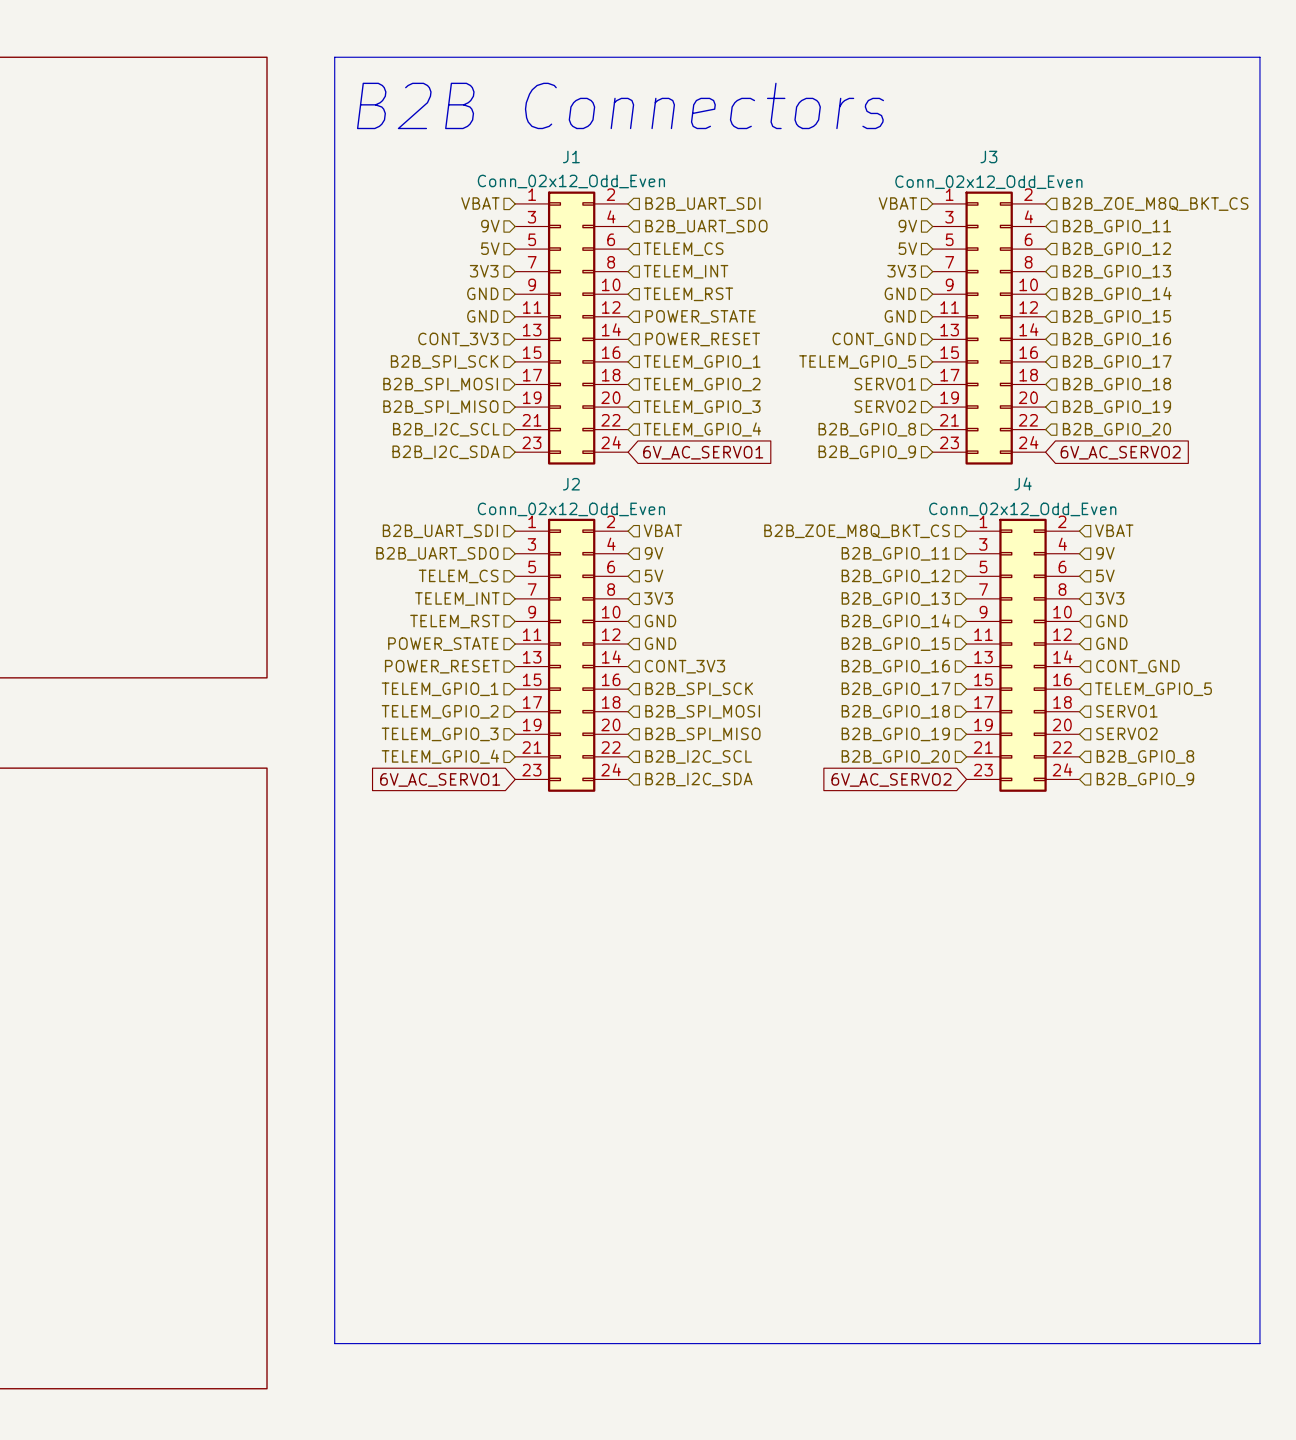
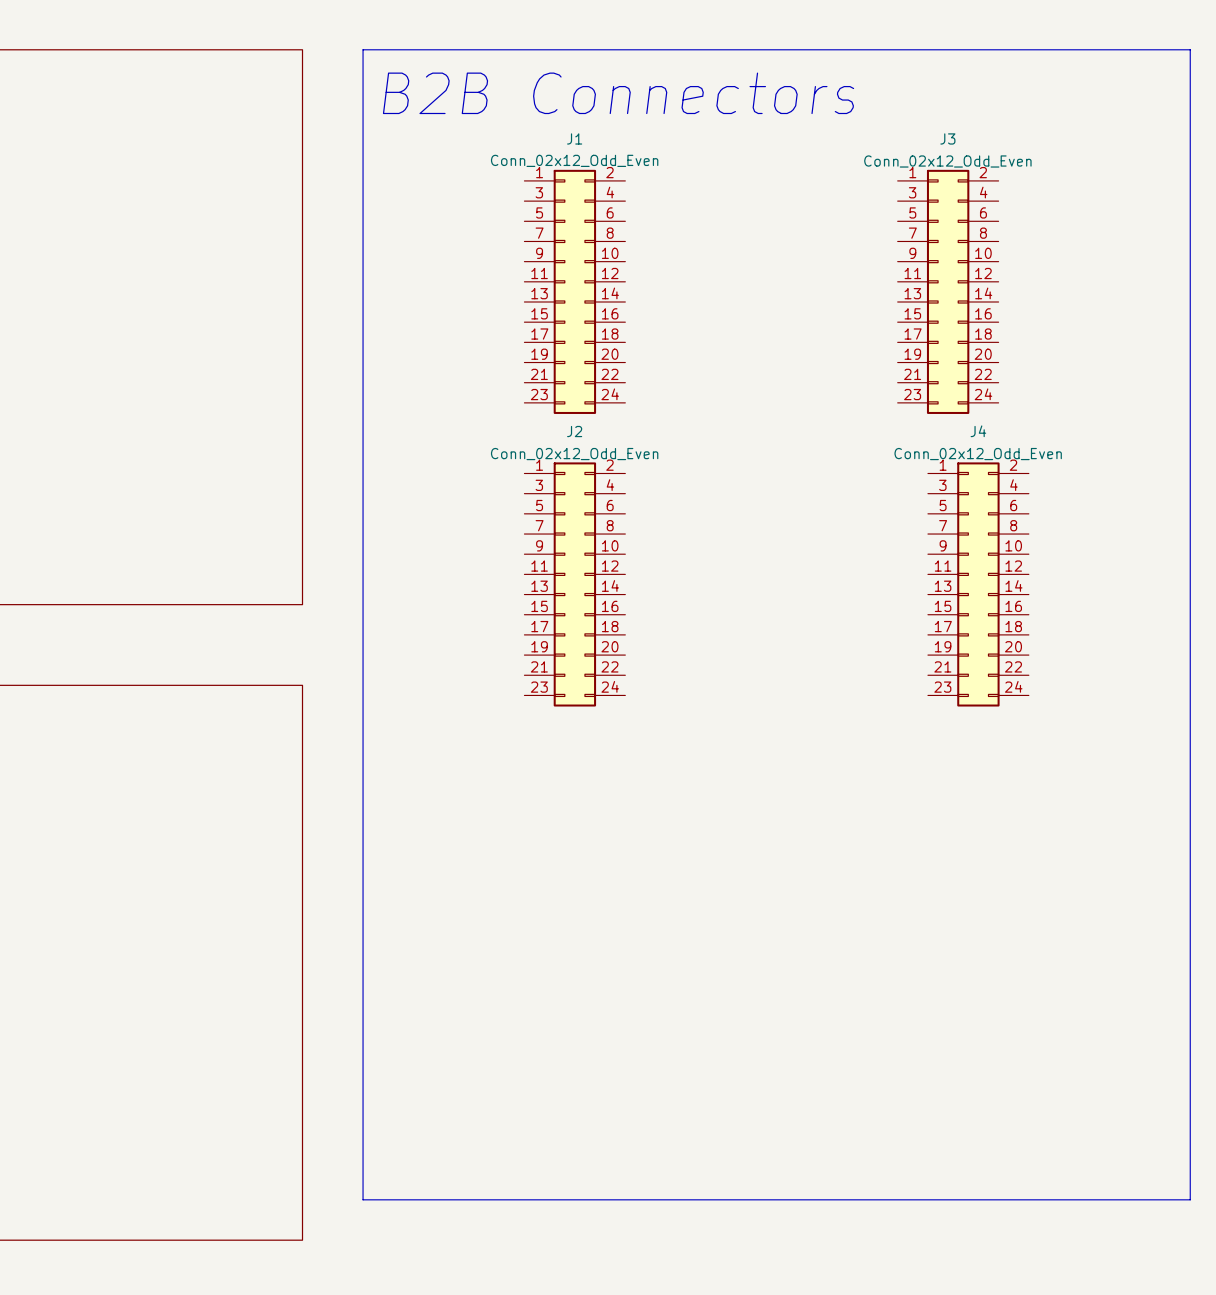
hierarchical label: VBAT (480, 203) -> none
hierarchical label: VBAT (897, 203) -> none
hierarchical label: B2B_UART_SDI (702, 204) -> none
hierarchical label: B2B_ZOE_M8Q_BKT_CS (1155, 204) -> none
hierarchical label: 9V (490, 226) -> none
hierarchical label: B2B_UART_SDO (706, 226) -> none
hierarchical label: 9V (907, 226) -> none
hierarchical label: B2B_GPIO_11 (1116, 226) -> none
hierarchical label: 5V (490, 248) -> none
hierarchical label: 5V (907, 248) -> none
hierarchical label: TELEM_CS (683, 249) -> none
hierarchical label: B2B_GPIO_12 (1116, 249) -> none
hierarchical label: 3V3 (484, 271) -> none
hierarchical label: TELEM_INT (686, 271) -> none
hierarchical label: 3V3 (901, 271) -> none
hierarchical label: B2B_GPIO_13 (1116, 271) -> none
hierarchical label: GND (482, 293) -> none
hierarchical label: GND (900, 293) -> none
hierarchical label: TELEM_RST (688, 294) -> none
hierarchical label: B2B_GPIO_14 (1117, 294) -> none
hierarchical label: GND (482, 316) -> none
hierarchical label: POWER_STATE (700, 316) -> none
hierarchical label: GND (900, 316) -> none
hierarchical label: B2B_GPIO_15 (1116, 316) -> none
hierarchical label: CONT_3V3 (458, 339) -> none
hierarchical label: POWER_RESET (702, 339) -> none
hierarchical label: CONT_GND (874, 339) -> none
hierarchical label: B2B_GPIO_16 (1116, 339) -> none
hierarchical label: B2B_SPI_SCK (444, 362) -> none
hierarchical label: TELEM_GPIO_1 (702, 362) -> none
hierarchical label: TELEM_GPIO_5 (857, 362) -> none
hierarchical label: B2B_GPIO_17 (1117, 362) -> none
hierarchical label: B2B_SPI_MOSI (440, 384) -> none
hierarchical label: TELEM_GPIO_2 (702, 384) -> none
hierarchical label: SERVO1 (885, 384) -> none
hierarchical label: B2B_GPIO_18 (1116, 384) -> none
hierarchical label: SERVO2 (885, 406) -> none
hierarchical label: B2B_SPI_MISO (440, 407) -> none
hierarchical label: TELEM_GPIO_3 (702, 407) -> none
hierarchical label: B2B_GPIO_19 (1116, 407) -> none
hierarchical label: B2B_I2C_SCL (446, 429) -> none
hierarchical label: TELEM_GPIO_4 (702, 429) -> none
hierarchical label: B2B_GPIO_8 (867, 429) -> none
hierarchical label: B2B_GPIO_20 (1116, 429) -> none
hierarchical label: B2B_I2C_SDA (446, 452) -> none
global label: 6V_AC_SERVO1 (703, 452) -> none
hierarchical label: B2B_GPIO_9 (867, 452) -> none
global label: 6V_AC_SERVO2 (1120, 452) -> none
hierarchical label: VBAT (662, 530) -> none
hierarchical label: VBAT (1114, 530) -> none
hierarchical label: B2B_UART_SDI (440, 531) -> none
hierarchical label: B2B_ZOE_M8Q_BKT_CS (857, 531) -> none
hierarchical label: B2B_UART_SDO (437, 553) -> none
hierarchical label: 9V (654, 553) -> none
hierarchical label: B2B_GPIO_11 (895, 553) -> none
hierarchical label: 9V (1105, 553) -> none
hierarchical label: 5V (654, 575) -> none
hierarchical label: 5V (1105, 575) -> none
hierarchical label: TELEM_CS (458, 576) -> none
hierarchical label: B2B_GPIO_12 (895, 576) -> none
hierarchical label: TELEM_INT (457, 598) -> none
hierarchical label: 3V3 (658, 598) -> none
hierarchical label: B2B_GPIO_13 (895, 598) -> none
hierarchical label: 3V3 (1109, 598) -> none
hierarchical label: TELEM_RST (454, 621) -> none
hierarchical label: GND (660, 621) -> none
hierarchical label: B2B_GPIO_14 (896, 621) -> none
hierarchical label: GND (1111, 621) -> none
hierarchical label: GND (660, 643) -> none
hierarchical label: GND (1111, 643) -> none
hierarchical label: POWER_STATE (443, 644) -> none
hierarchical label: B2B_GPIO_15 (895, 644) -> none
hierarchical label: POWER_RESET (442, 666) -> none
hierarchical label: CONT_3V3 (684, 666) -> none
hierarchical label: B2B_GPIO_16 (895, 666) -> none
hierarchical label: CONT_GND (1137, 666) -> none
hierarchical label: TELEM_GPIO_1 (440, 689) -> none
hierarchical label: B2B_SPI_SCK (699, 689) -> none
hierarchical label: B2B_GPIO_17 (896, 689) -> none
hierarchical label: TELEM_GPIO_5 (1153, 689) -> none
hierarchical label: TELEM_GPIO_2 (440, 711) -> none
hierarchical label: B2B_SPI_MOSI (702, 711) -> none
hierarchical label: B2B_GPIO_18 (895, 711) -> none
hierarchical label: SERVO1 (1126, 711) -> none
hierarchical label: SERVO2 (1126, 733) -> none
hierarchical label: TELEM_GPIO_3 (440, 734) -> none
hierarchical label: B2B_SPI_MISO (702, 734) -> none
hierarchical label: B2B_GPIO_19 (895, 734) -> none
hierarchical label: TELEM_GPIO_4 (440, 756) -> none
hierarchical label: B2B_I2C_SCL (698, 756) -> none
hierarchical label: B2B_GPIO_20 (895, 756) -> none
hierarchical label: B2B_GPIO_8 (1145, 756) -> none
global label: 6V_AC_SERVO1 (440, 779) -> none
hierarchical label: B2B_I2C_SDA (698, 779) -> none
global label: 6V_AC_SERVO2 (891, 779) -> none
hierarchical label: B2B_GPIO_9 (1145, 779) -> none

